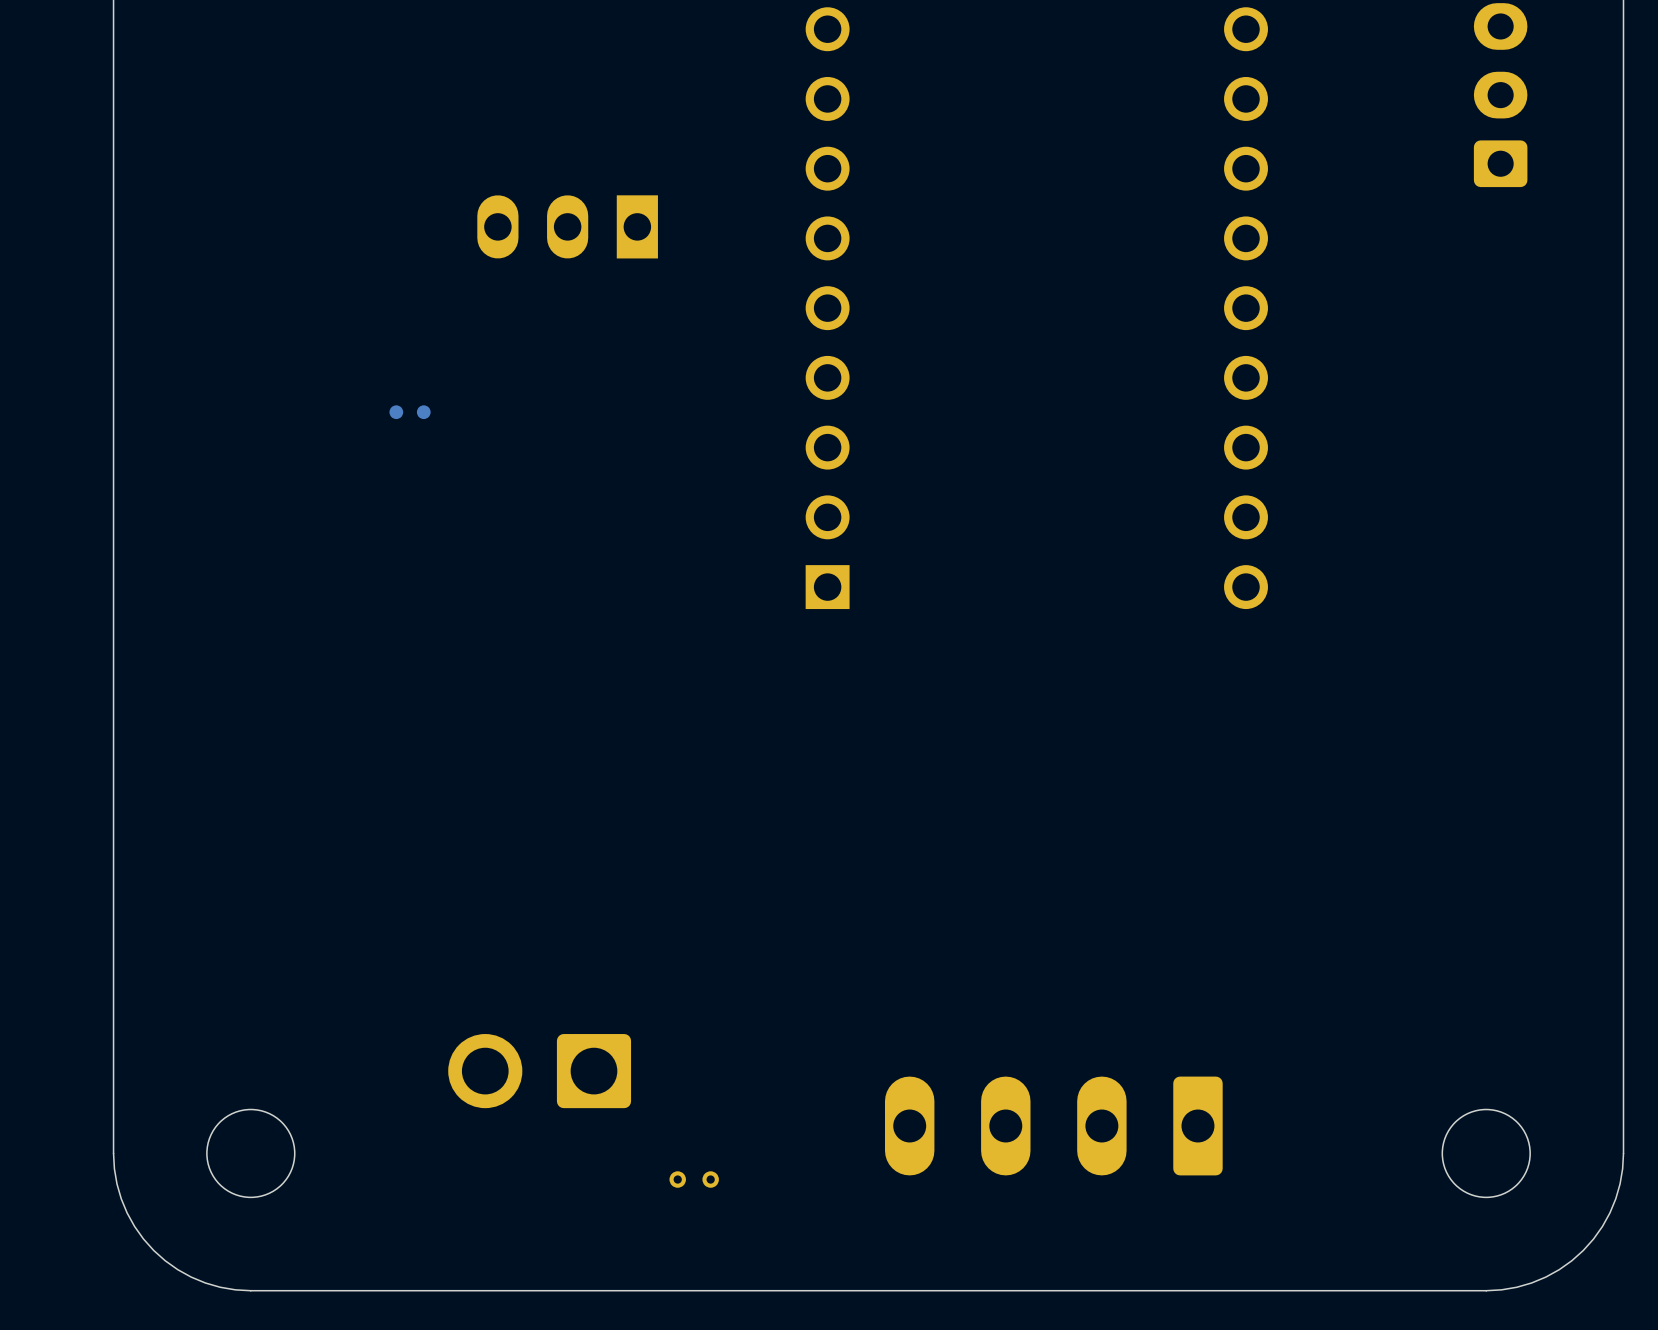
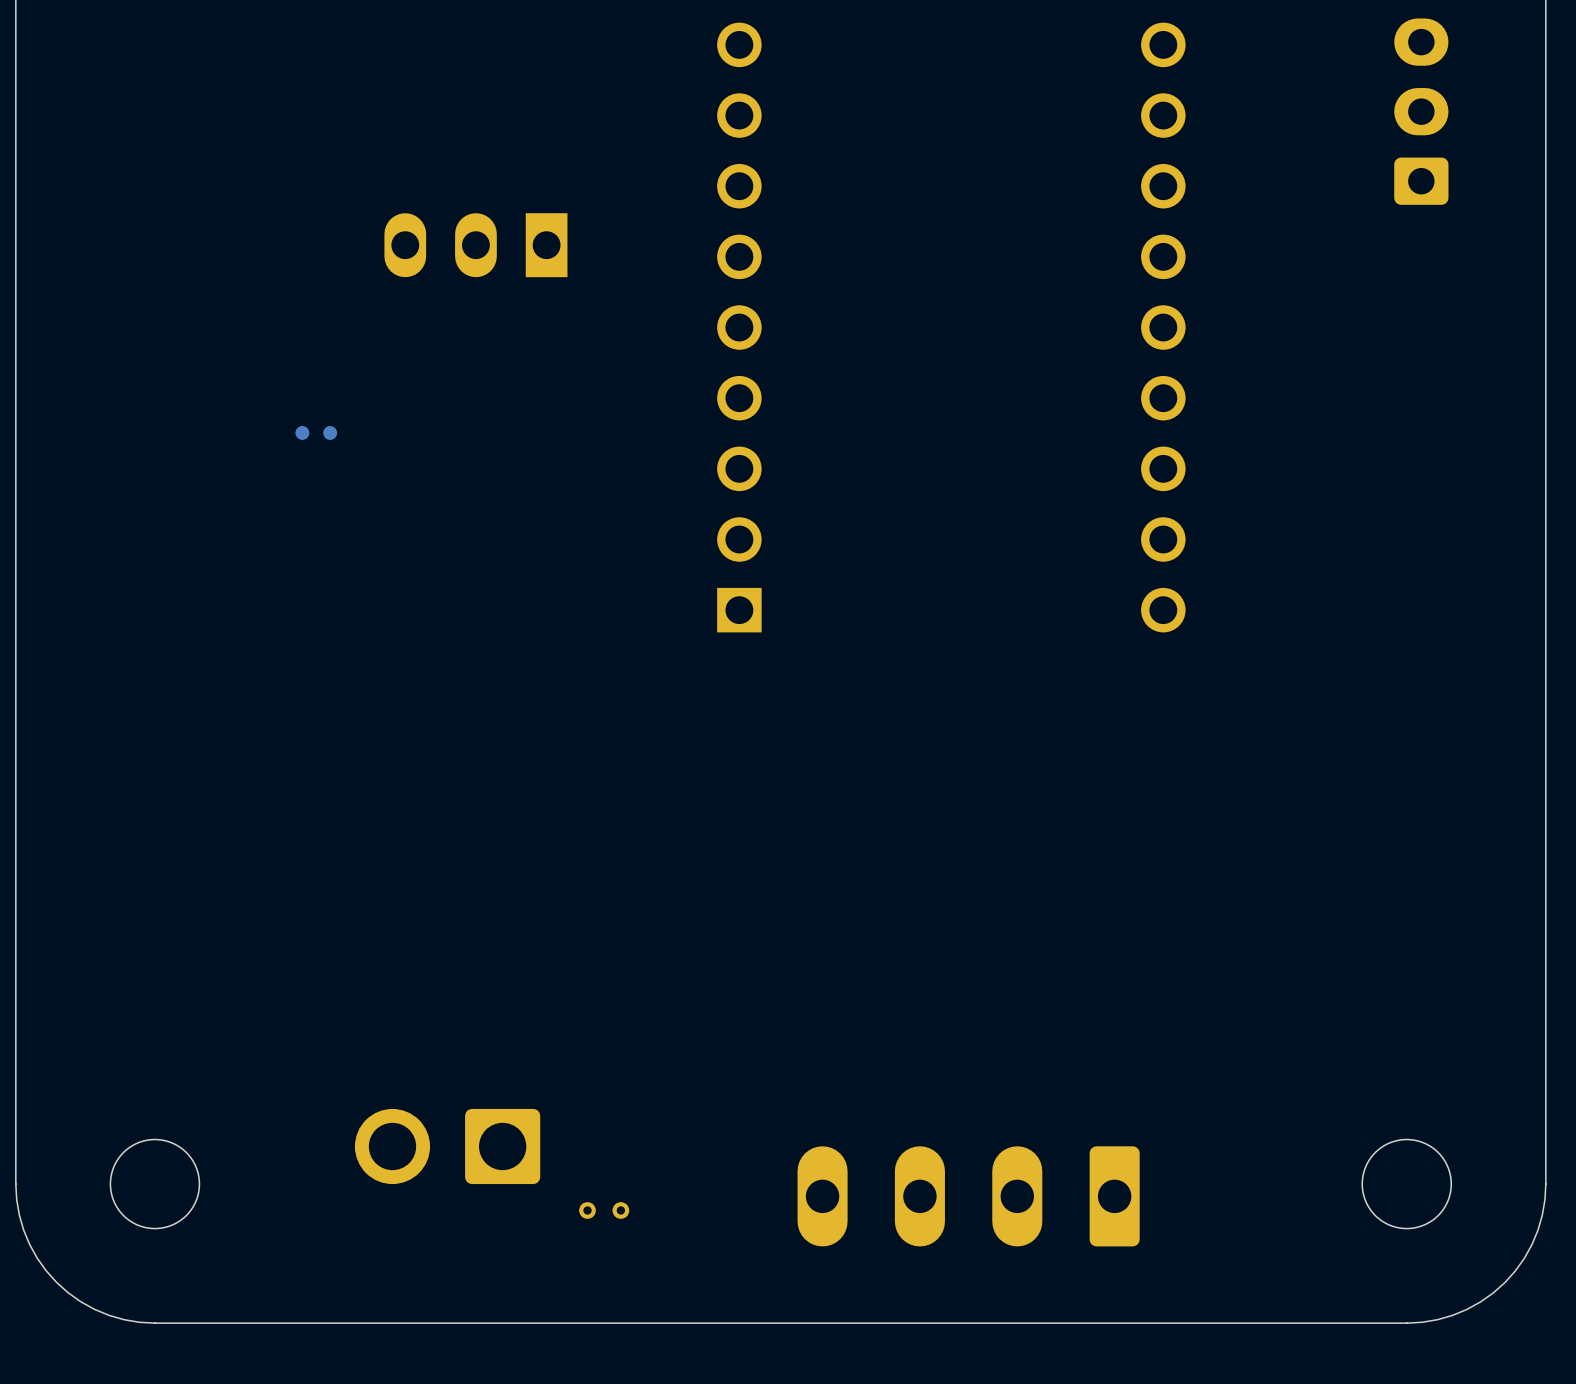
part position: (539, 1071) -> (447, 1146)
part position: (1053, 1125) -> (968, 1196)

